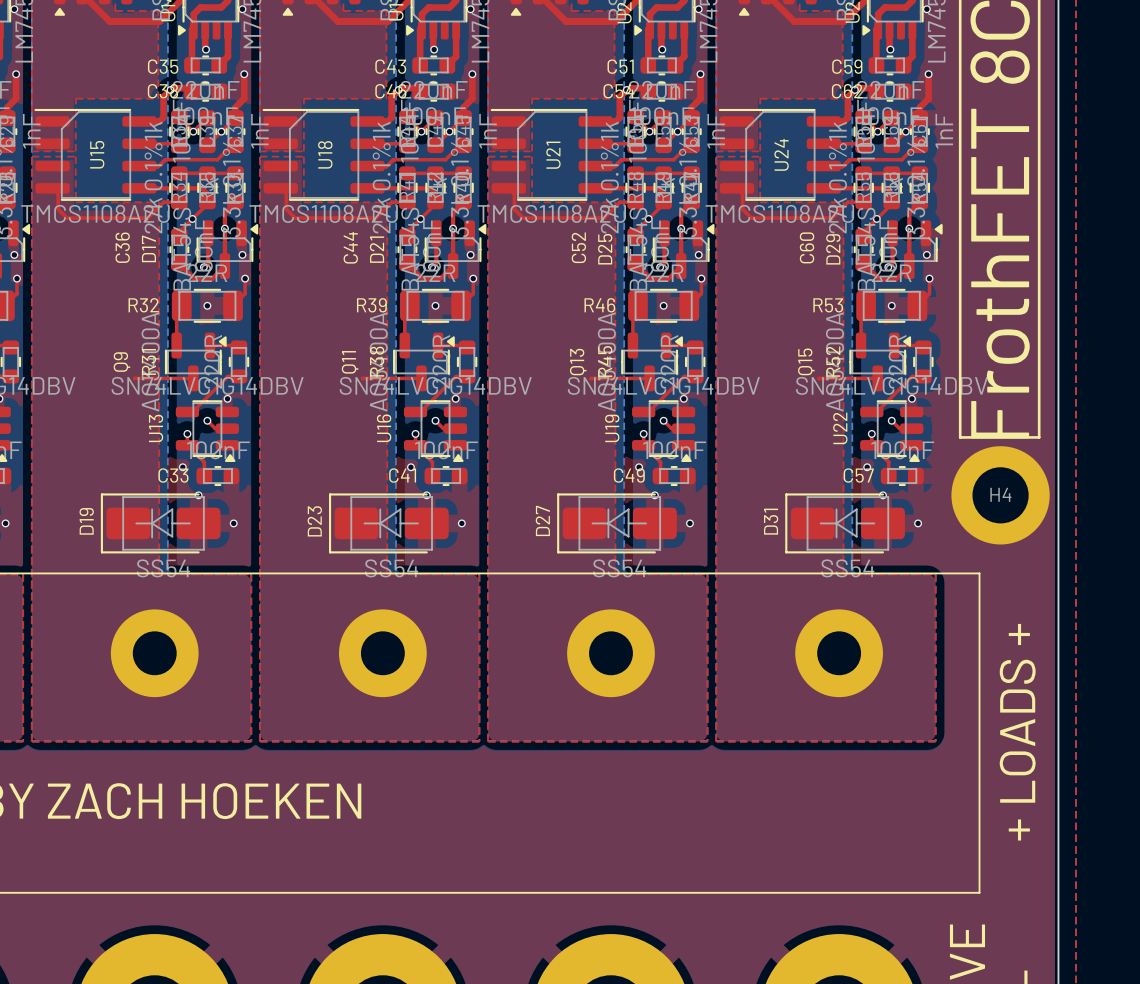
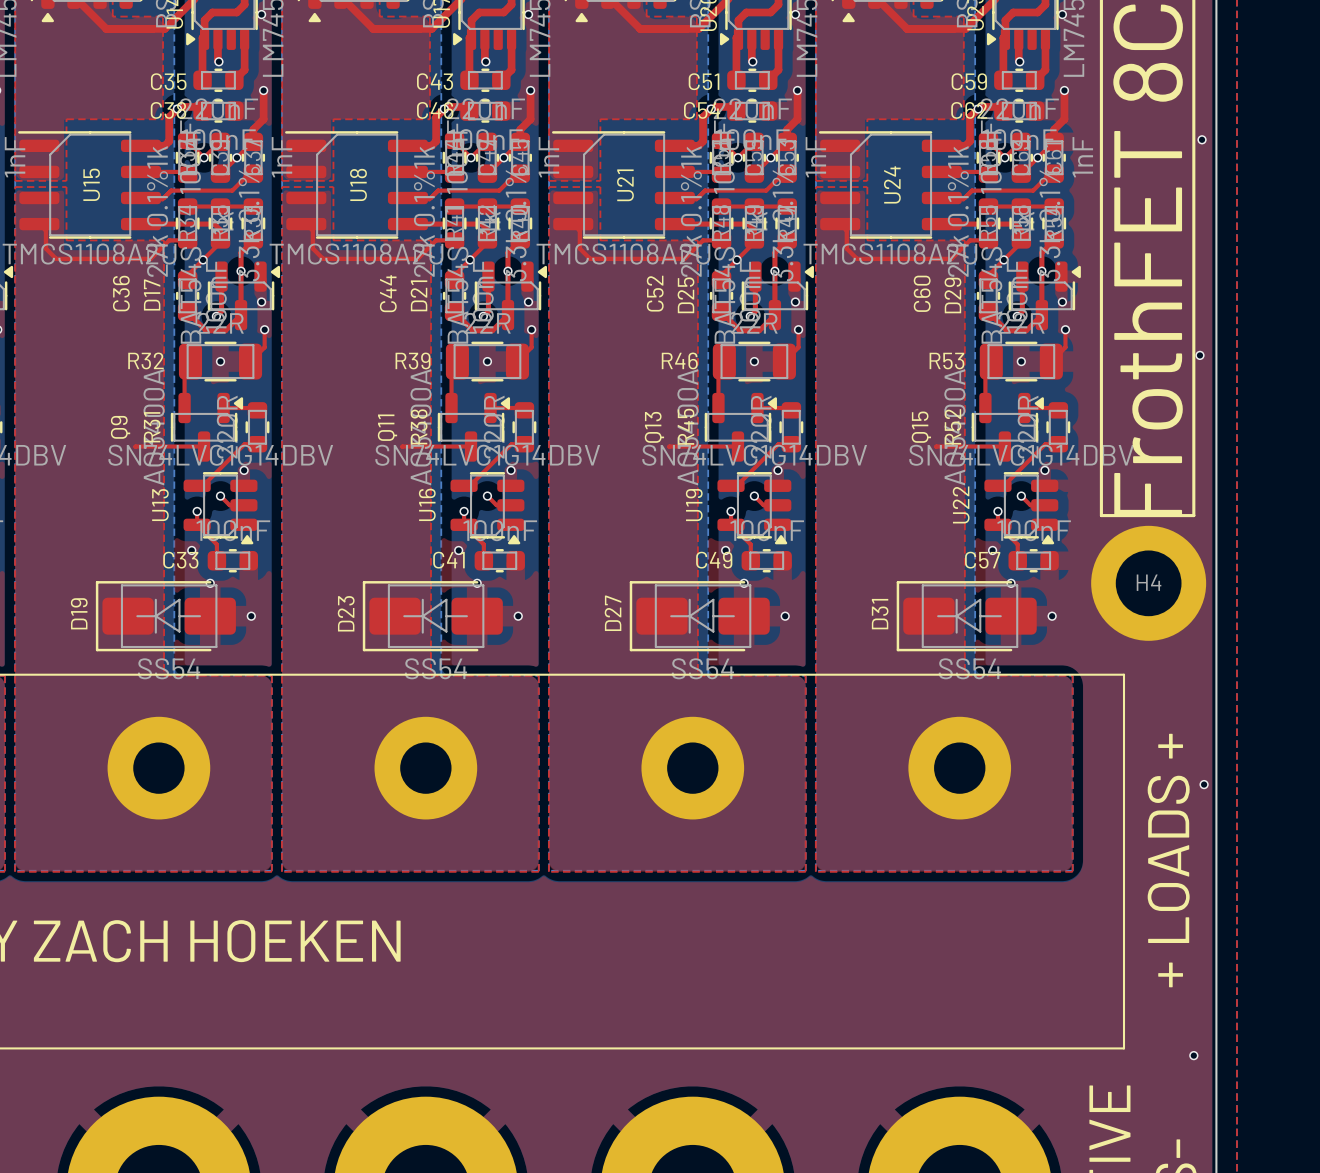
via: none -> (1202, 139)
via: none -> (1199, 355)
via: none -> (1204, 784)
via: none -> (1193, 1055)

